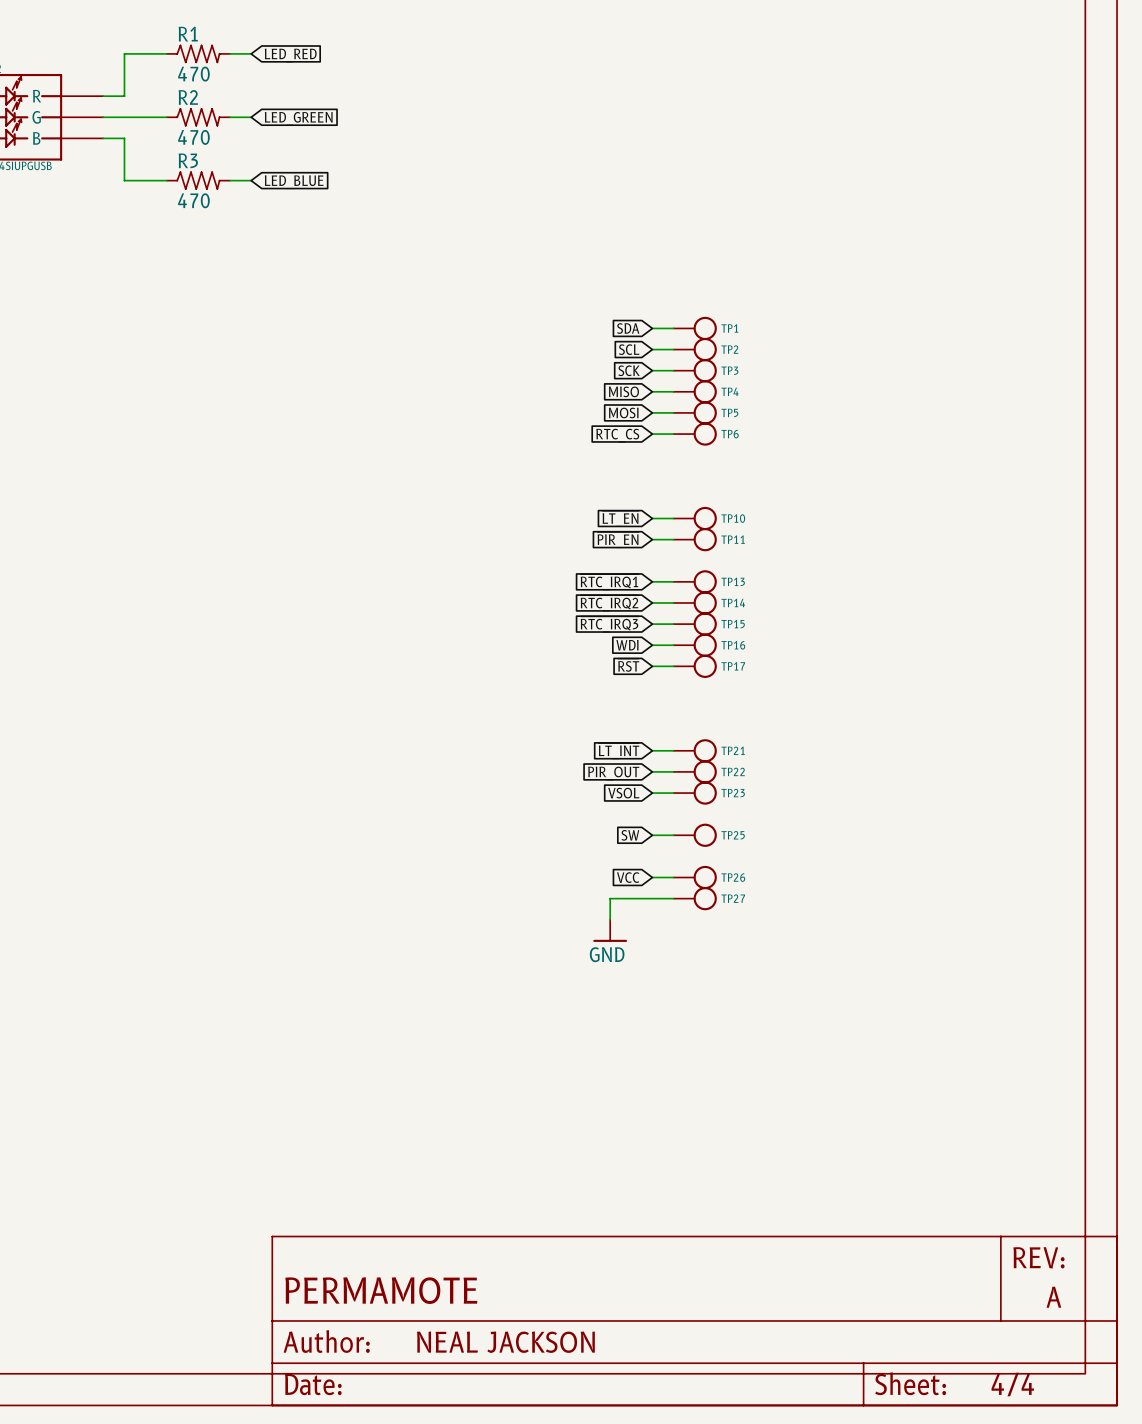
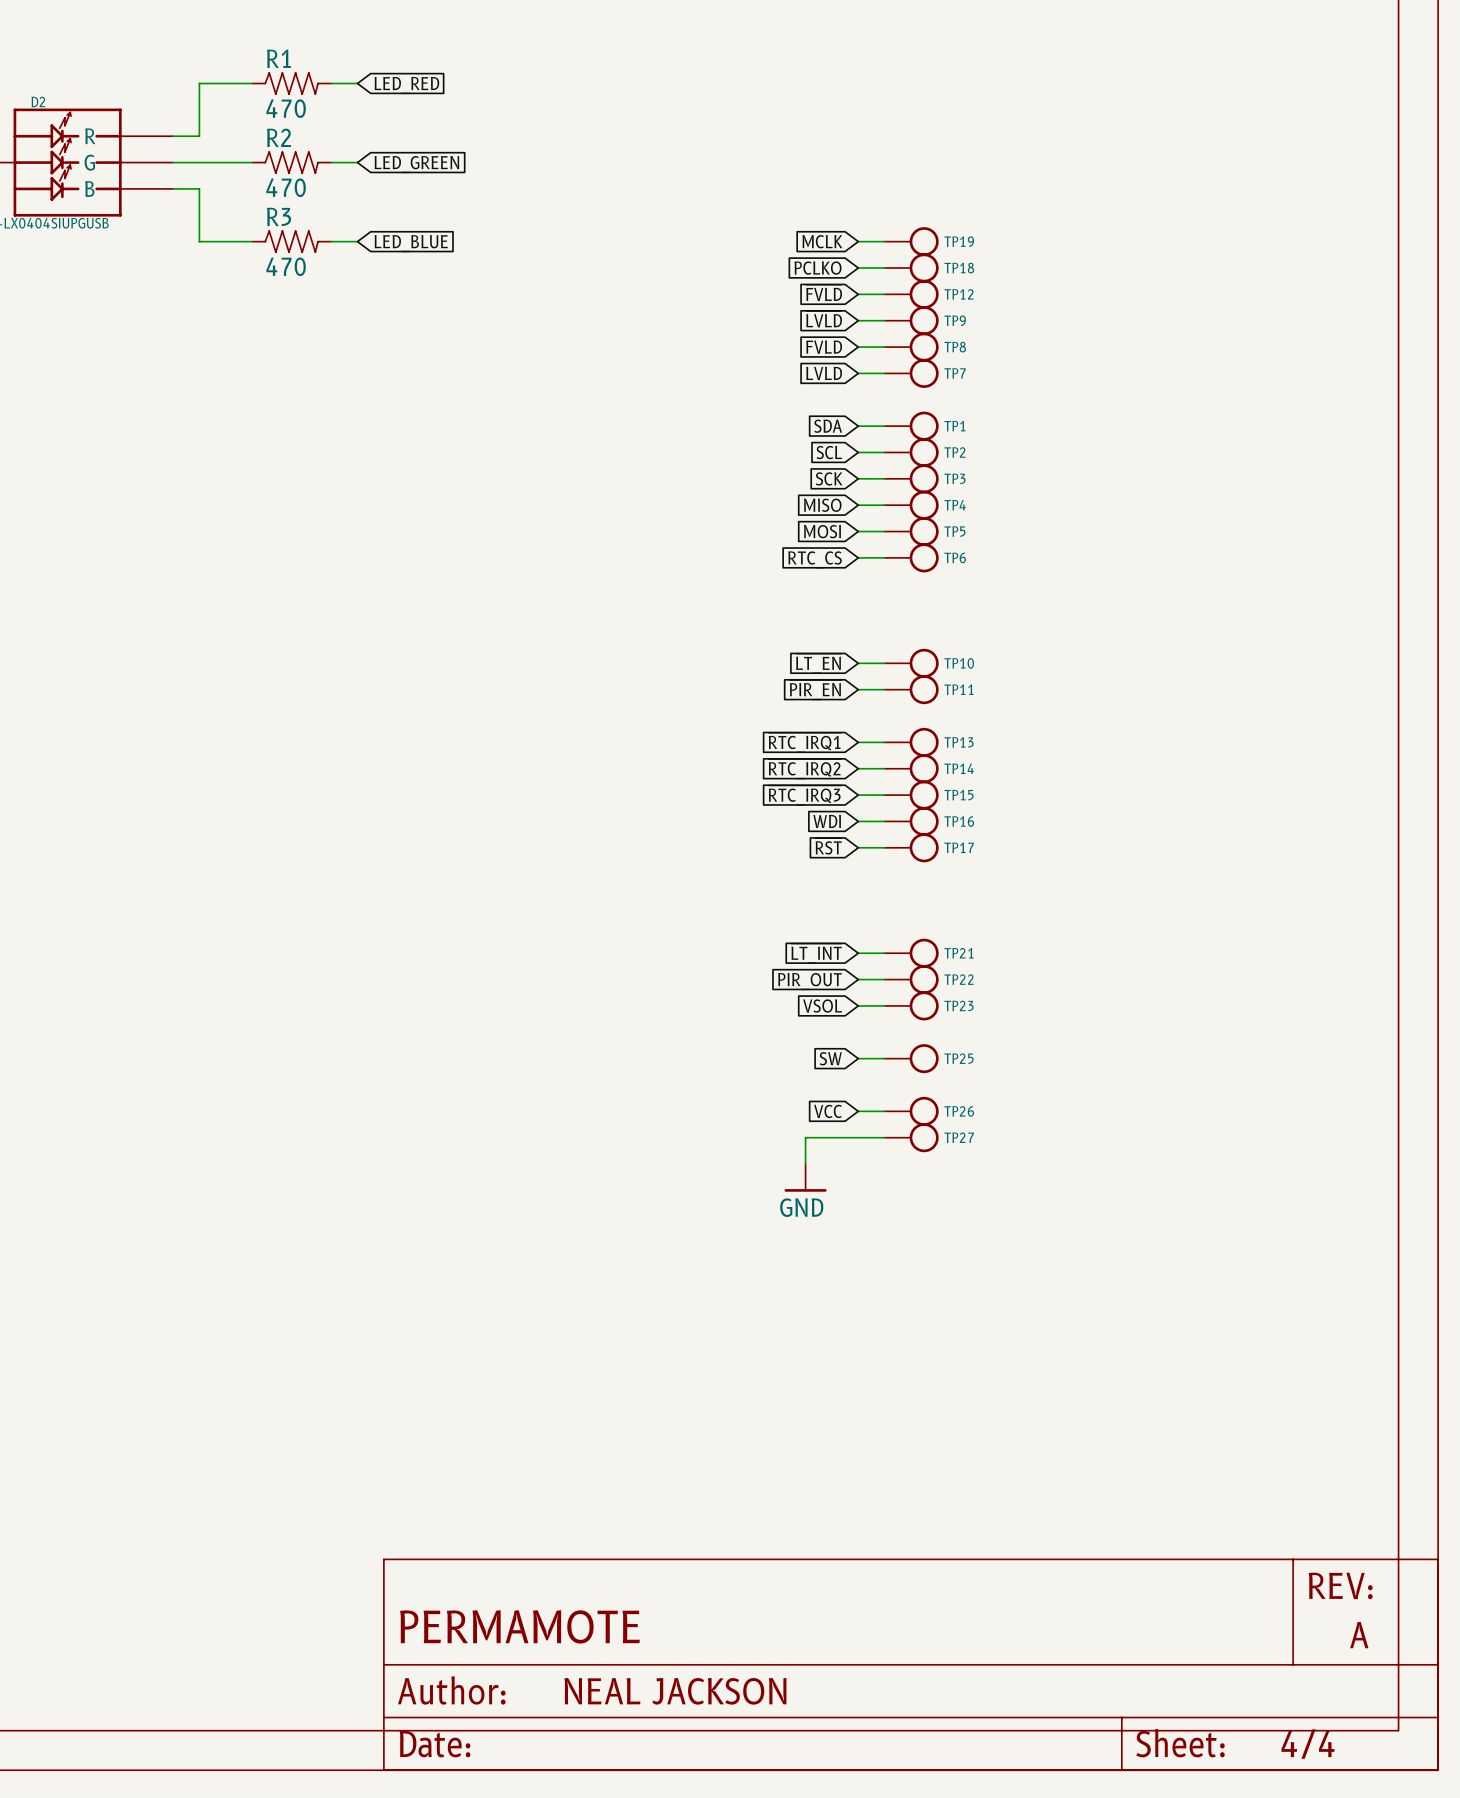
global label: none -> MCLK (822, 241)
wire: none -> (858, 241) (884, 241)
TP19: none -> (911, 241)
global label: none -> PCLKO (818, 268)
wire: none -> (858, 267) (884, 267)
TP18: none -> (911, 267)
global label: none -> ~{FVLD} (824, 292)
wire: none -> (858, 294) (884, 294)
TP12: none -> (911, 294)
global label: none -> ~{LVLD} (824, 319)
wire: none -> (858, 320) (884, 320)
TP9: none -> (911, 320)
global label: none -> FVLD (824, 347)
wire: none -> (858, 347) (884, 347)
TP8: none -> (911, 347)
global label: none -> LVLD (824, 373)
wire: none -> (858, 373) (884, 373)
TP7: none -> (911, 373)

